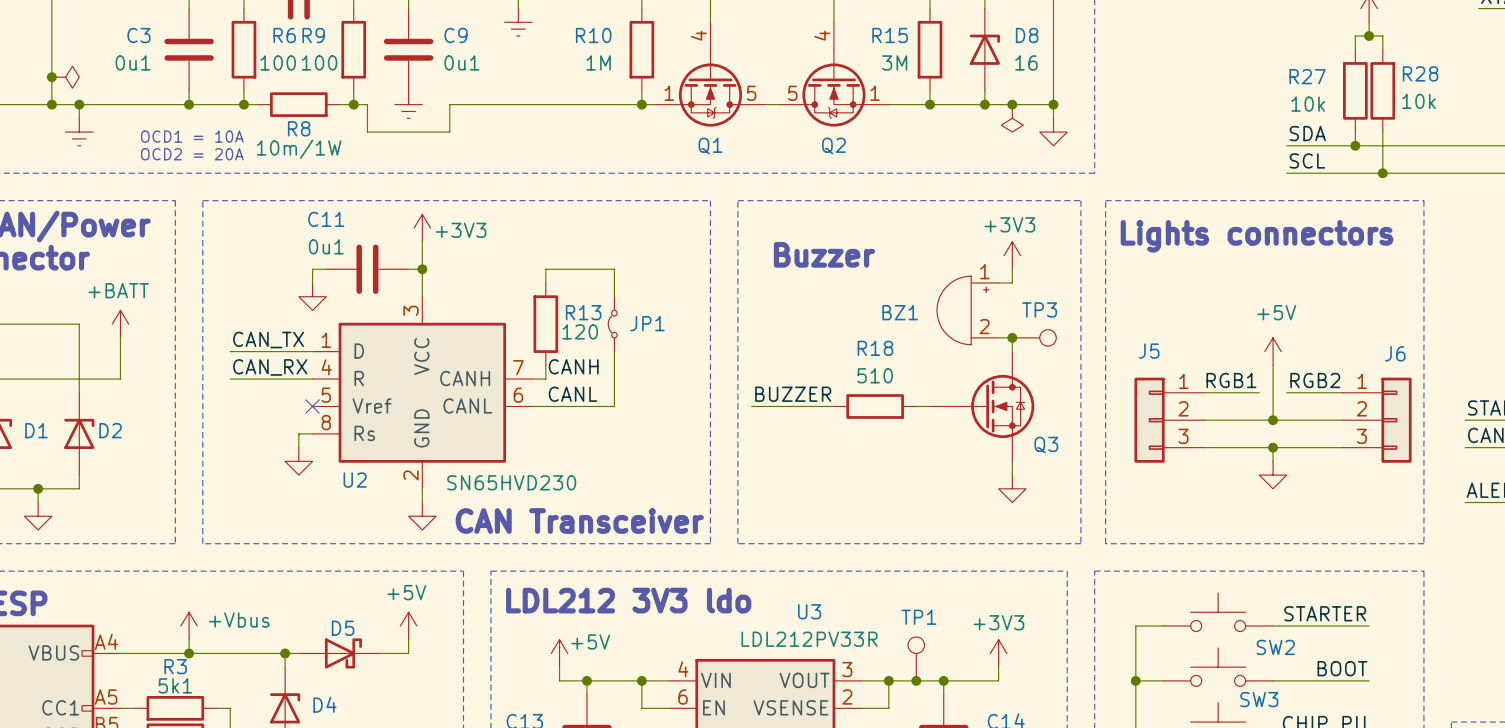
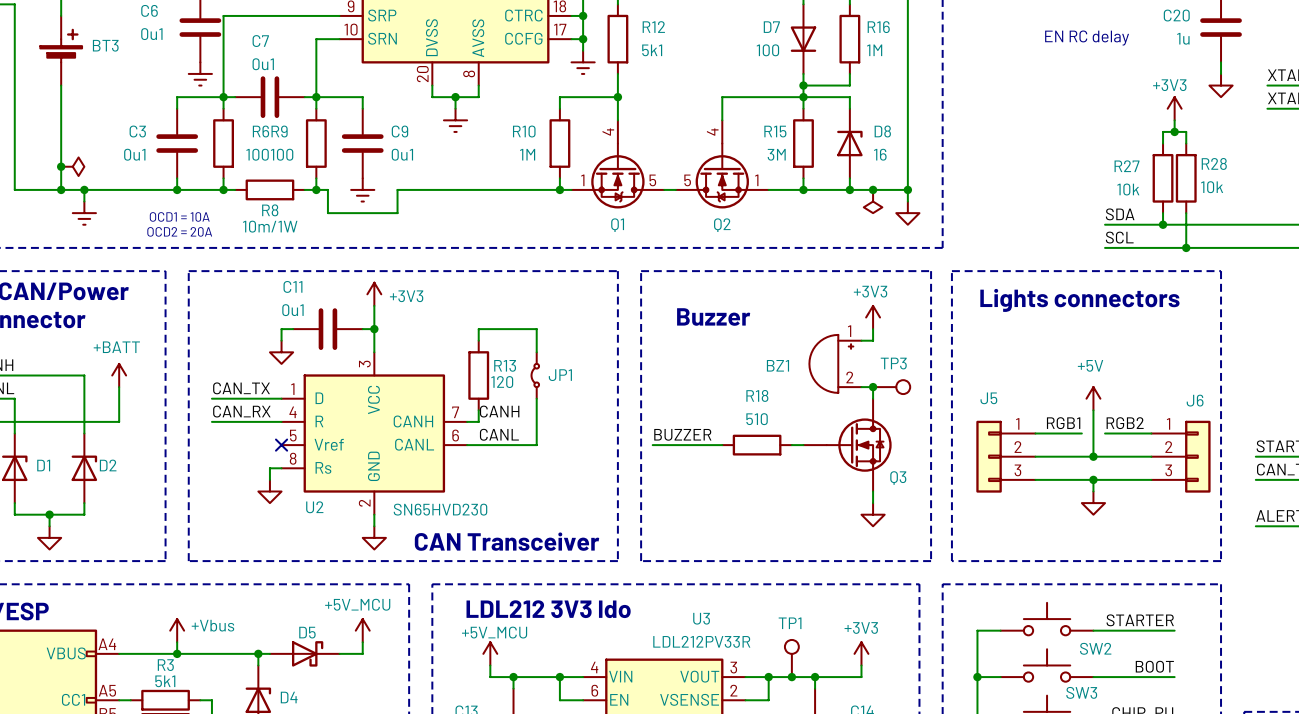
power symbol: +5V (408, 626) -> +5V_MCU (362, 630)
power symbol: +5V (559, 653) -> +5V_MCU (490, 653)

